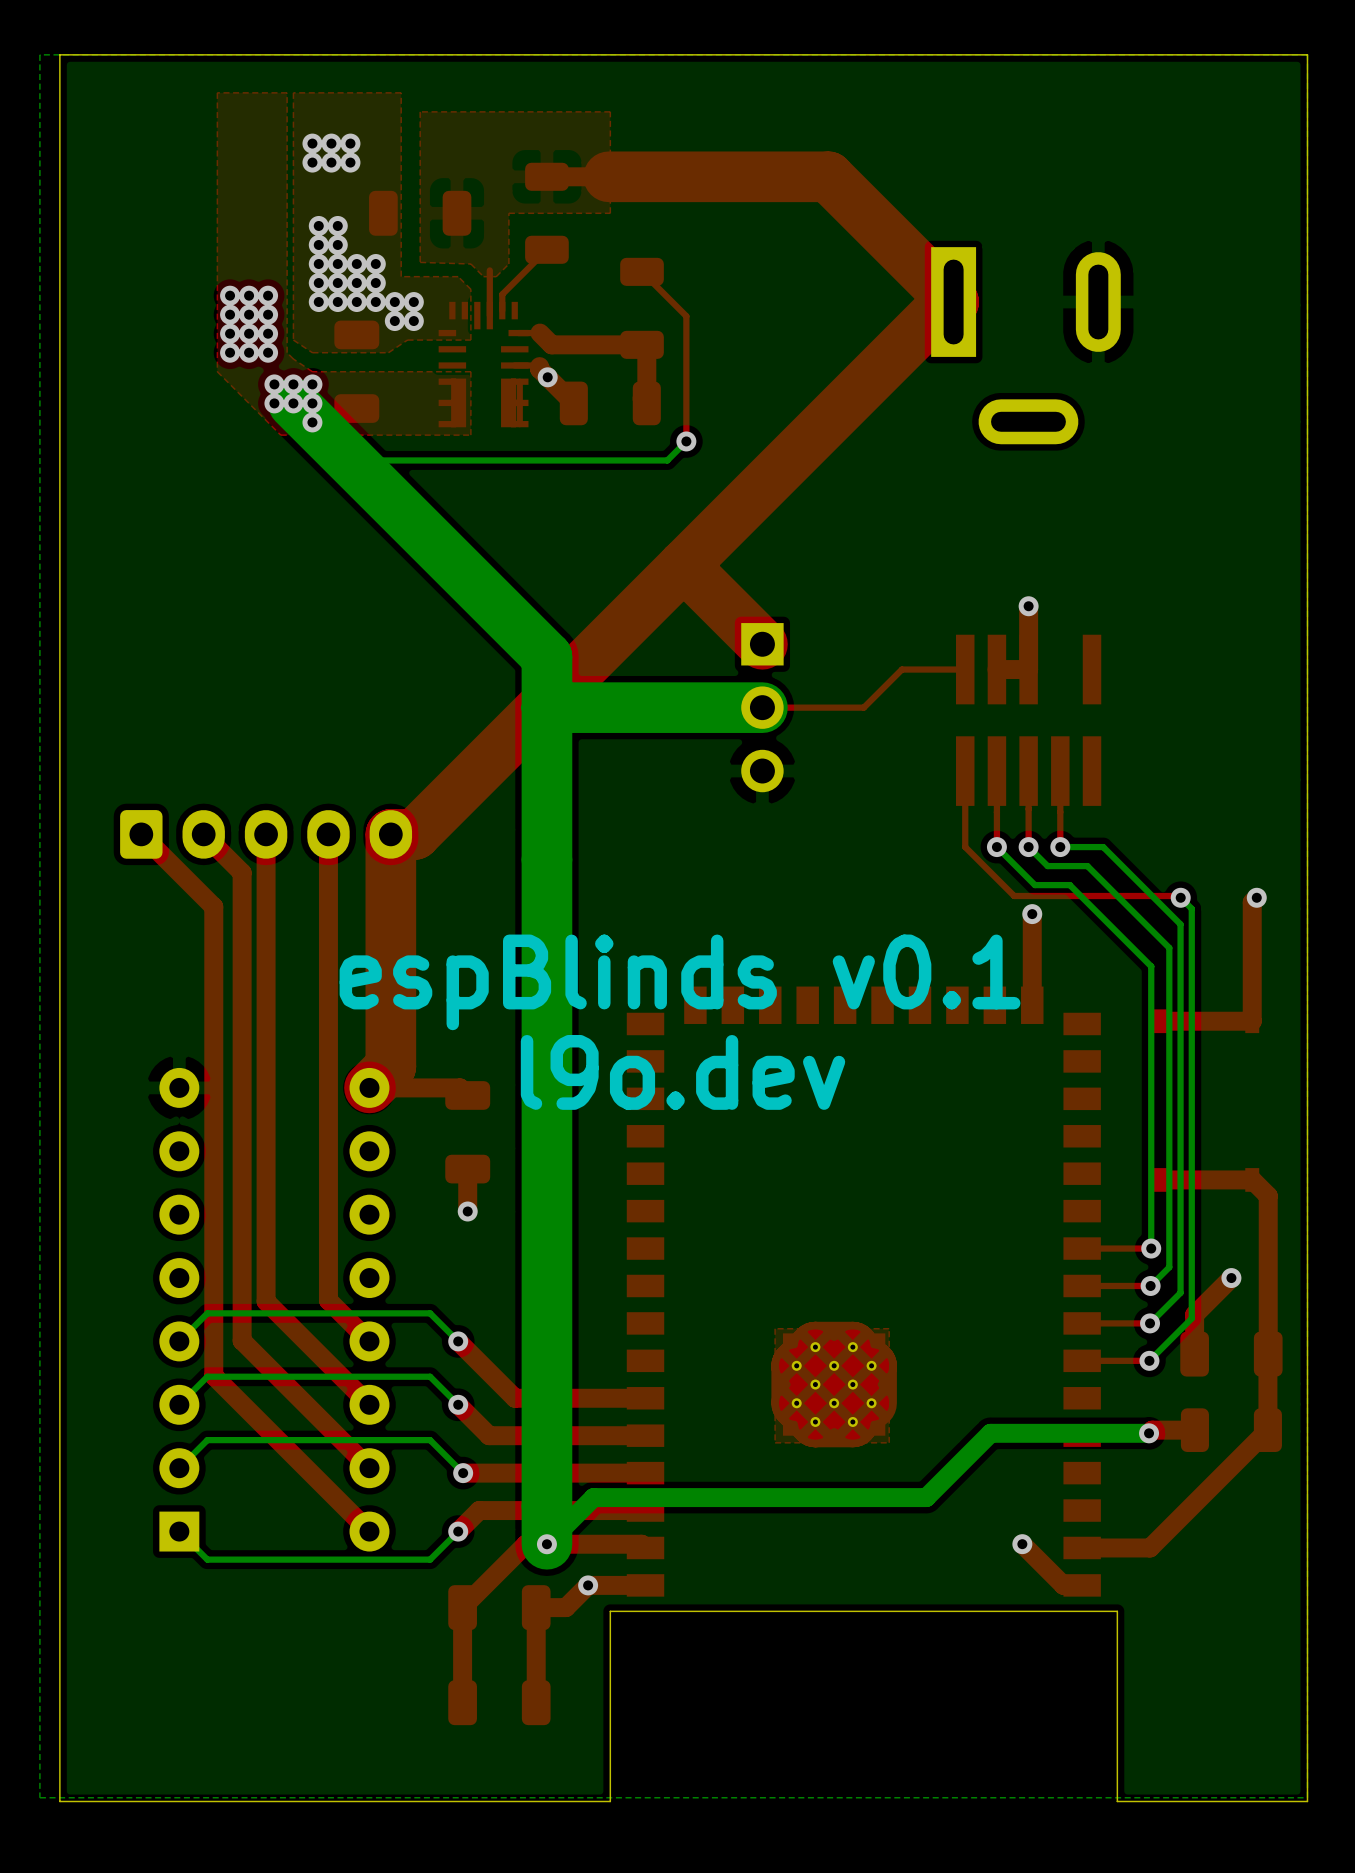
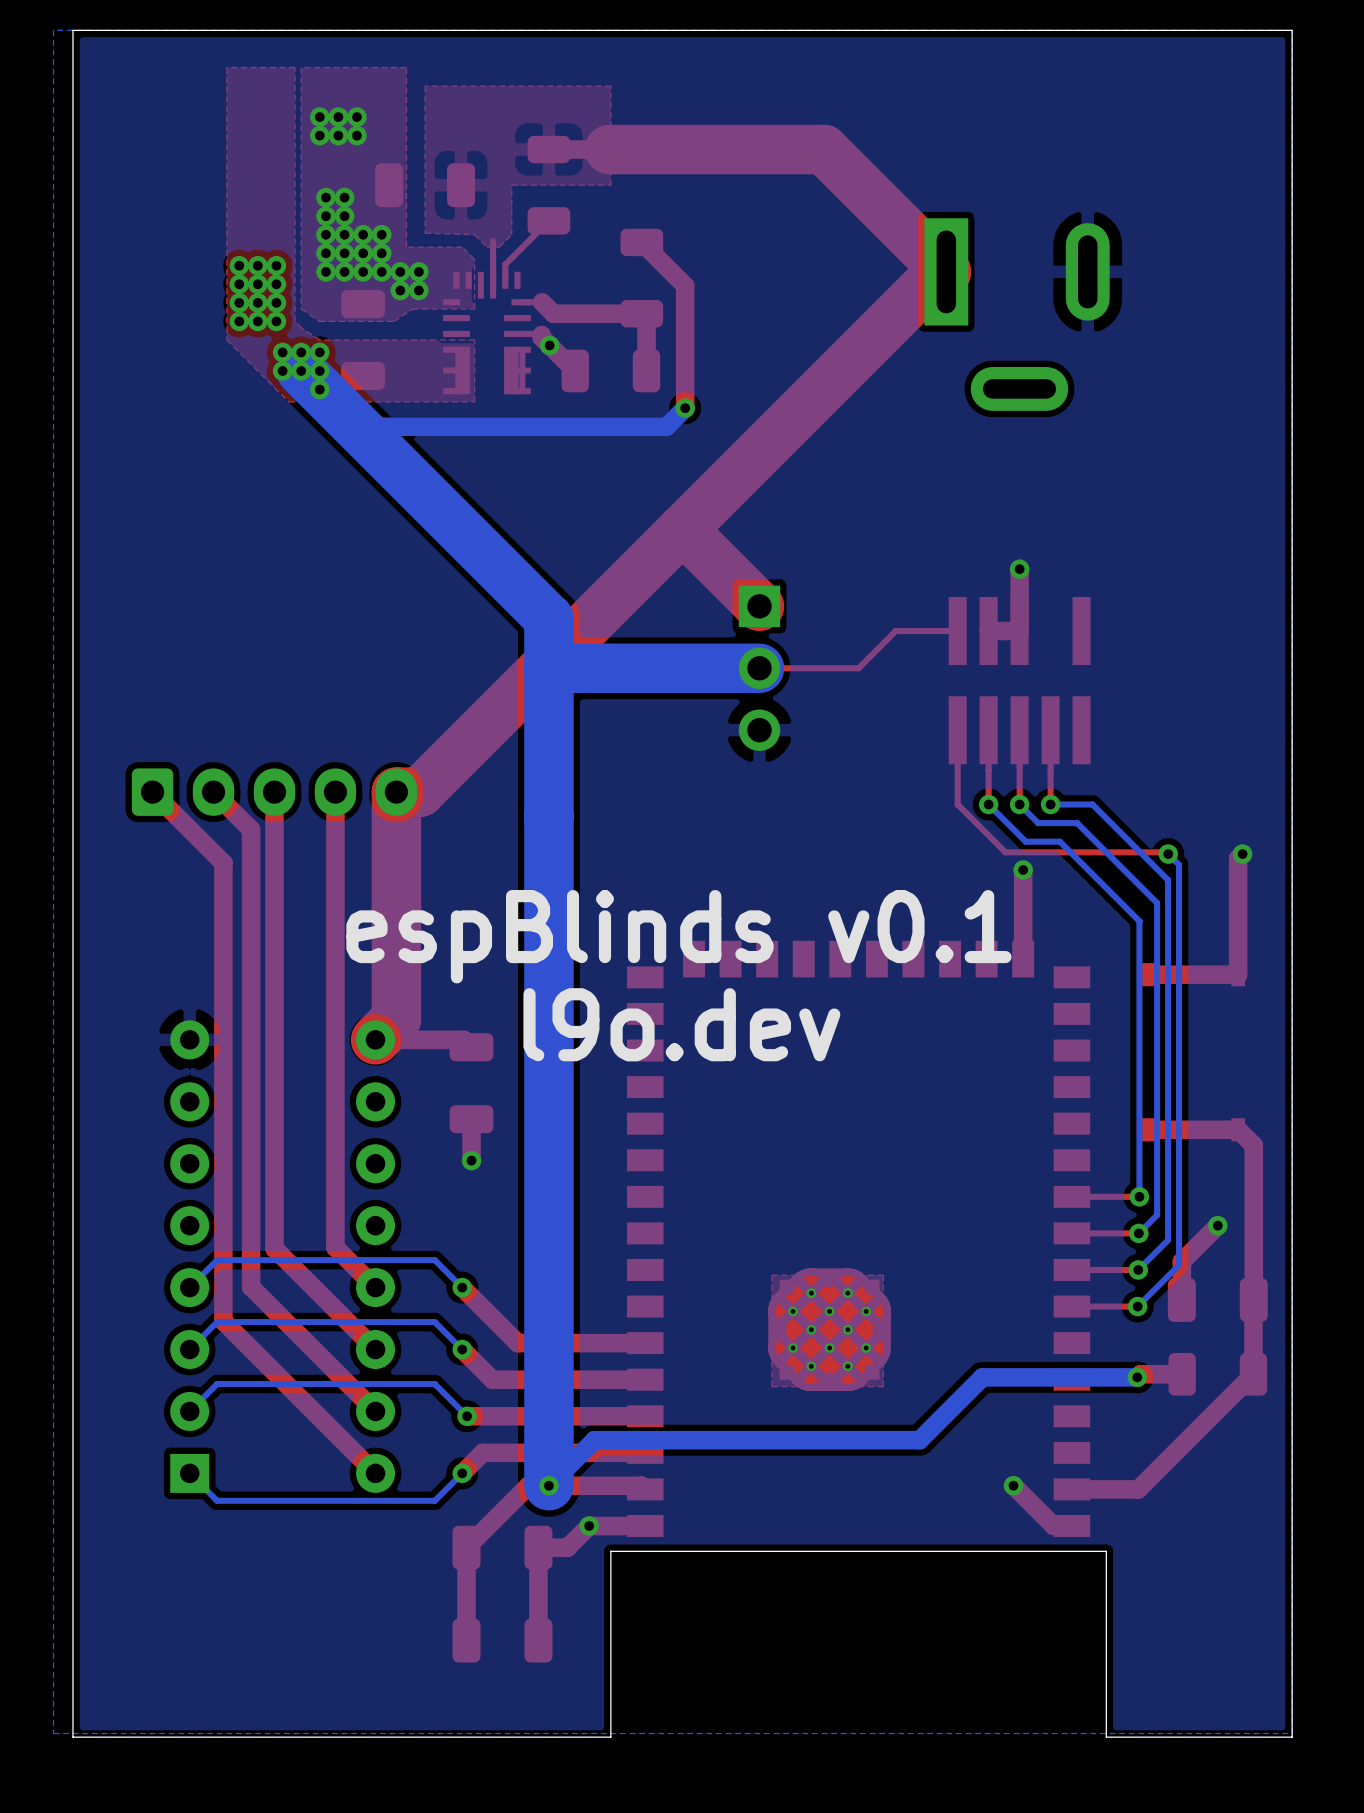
top track width: thin (642, 271) (686, 316) (686, 441) -> thick (641, 242) (685, 285) (685, 408)
bottom track width: thin (686, 441) (667, 460) (369, 460) -> thick (685, 408) (666, 426) (375, 426)

